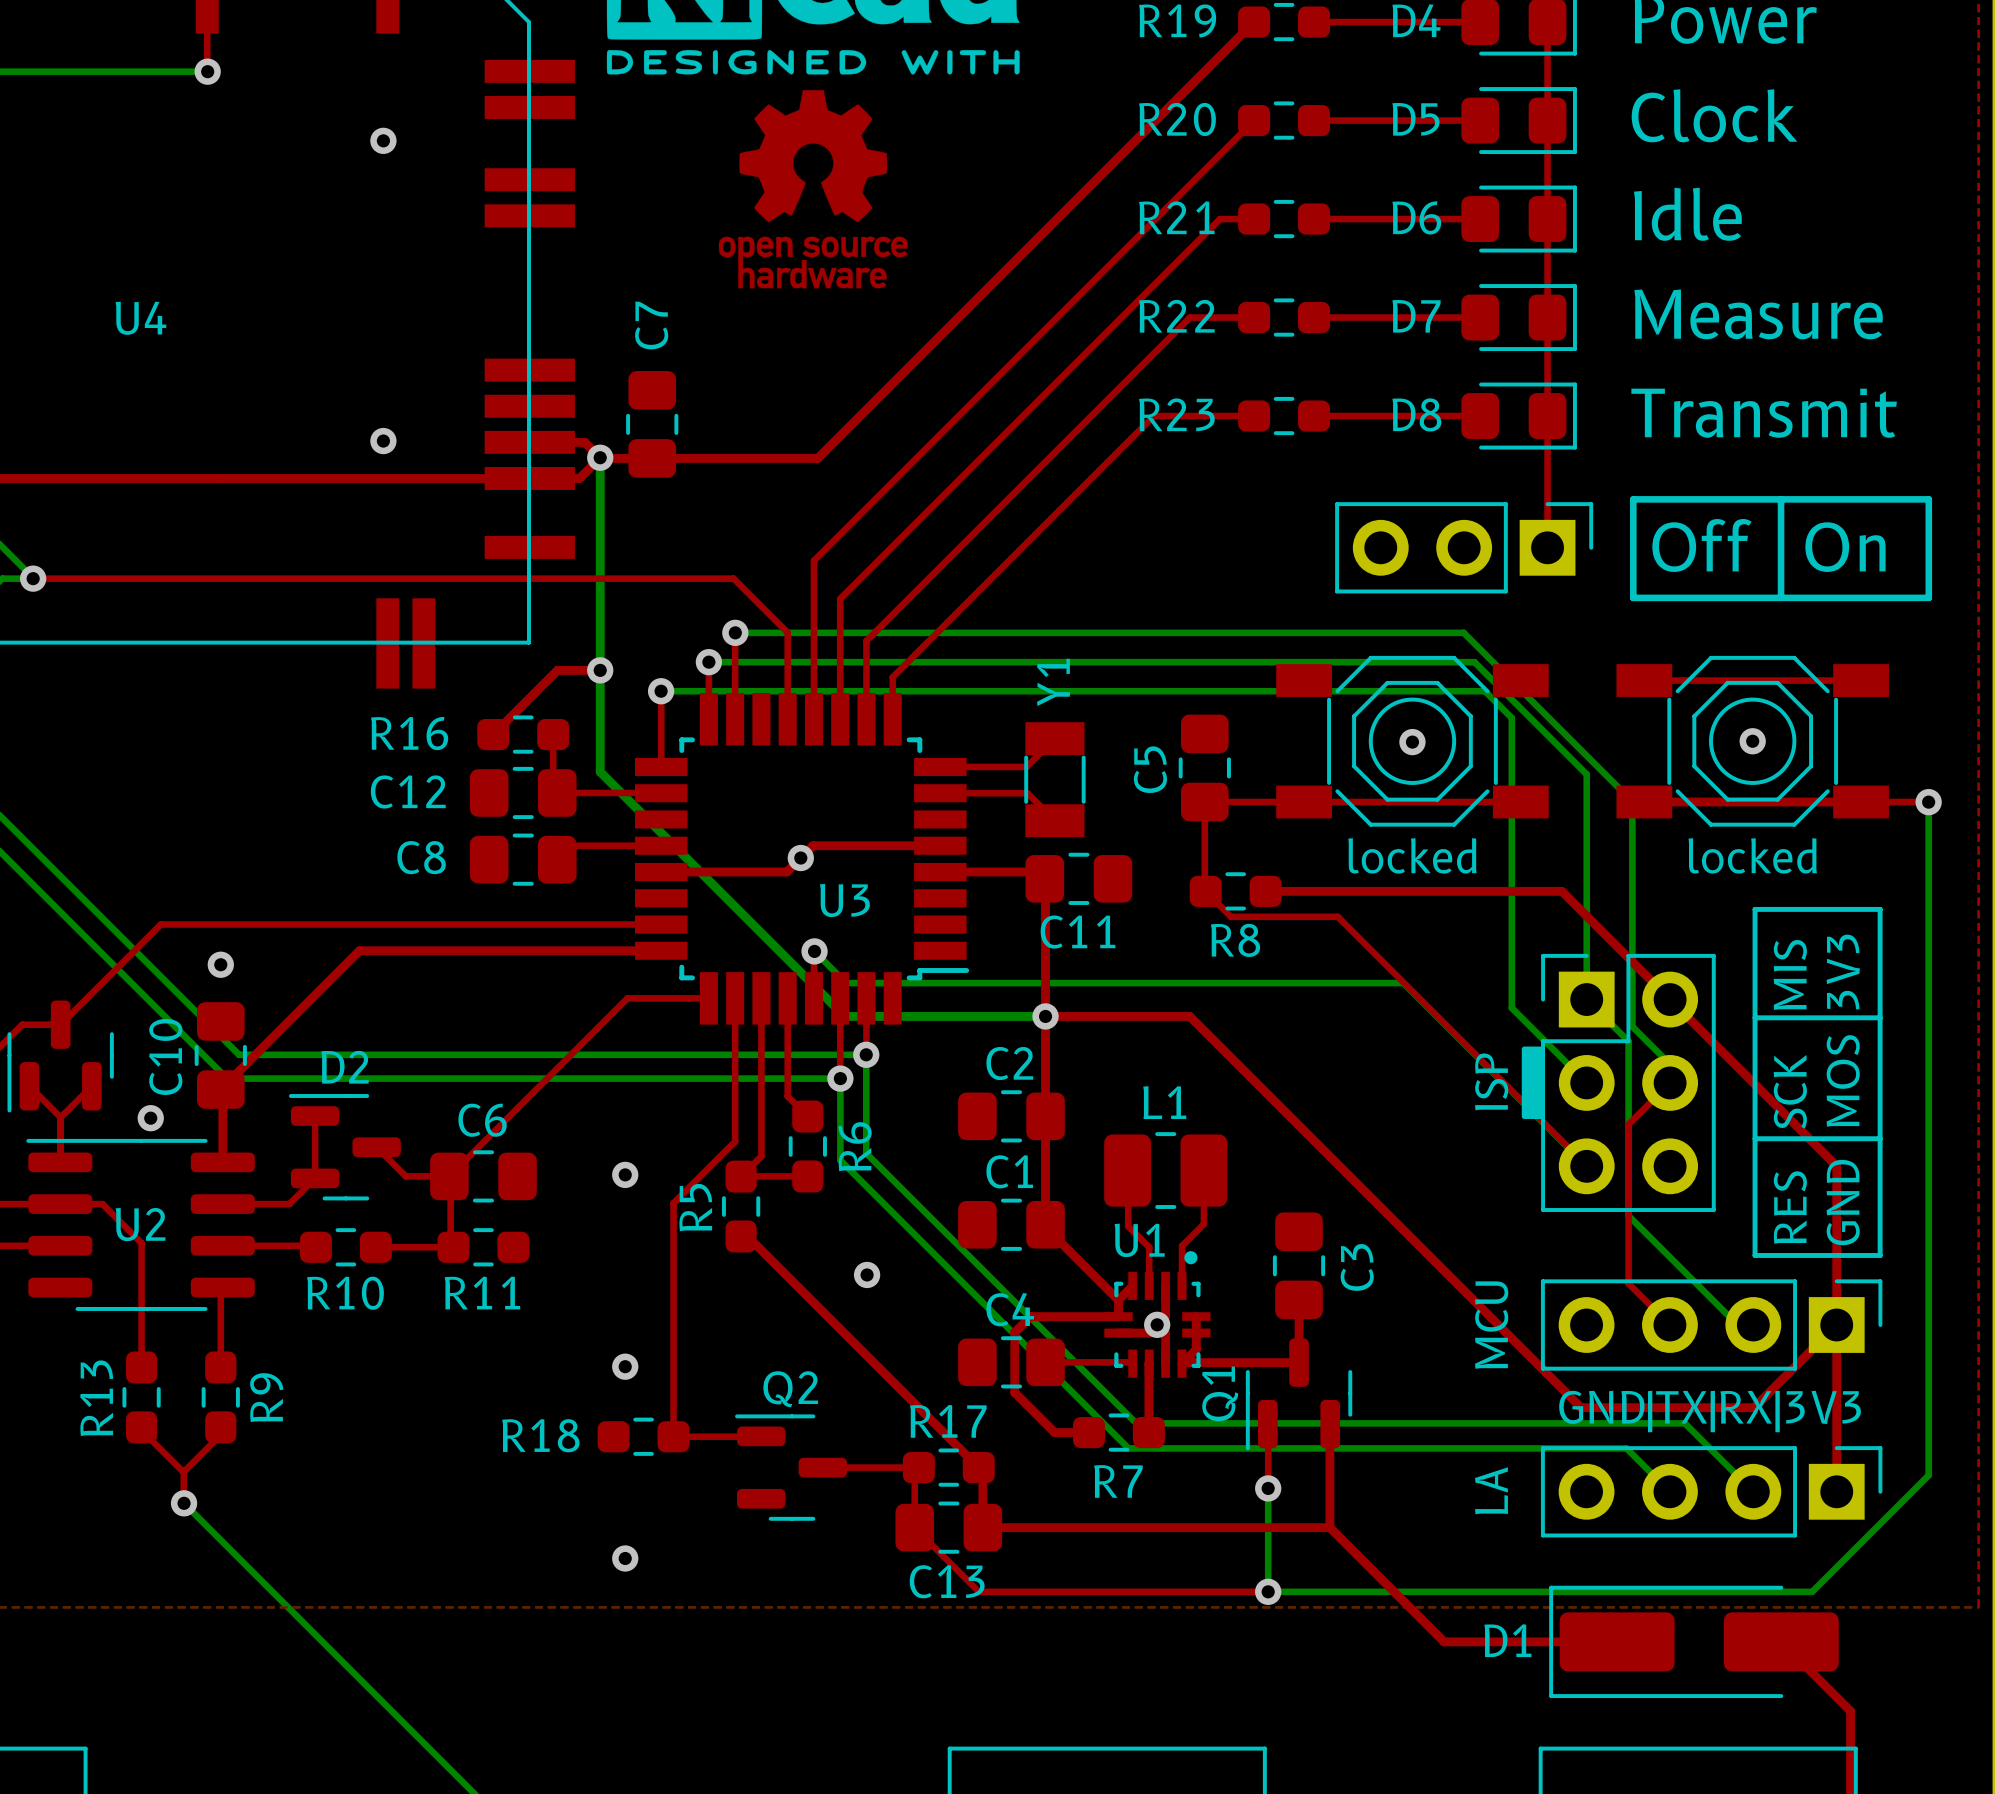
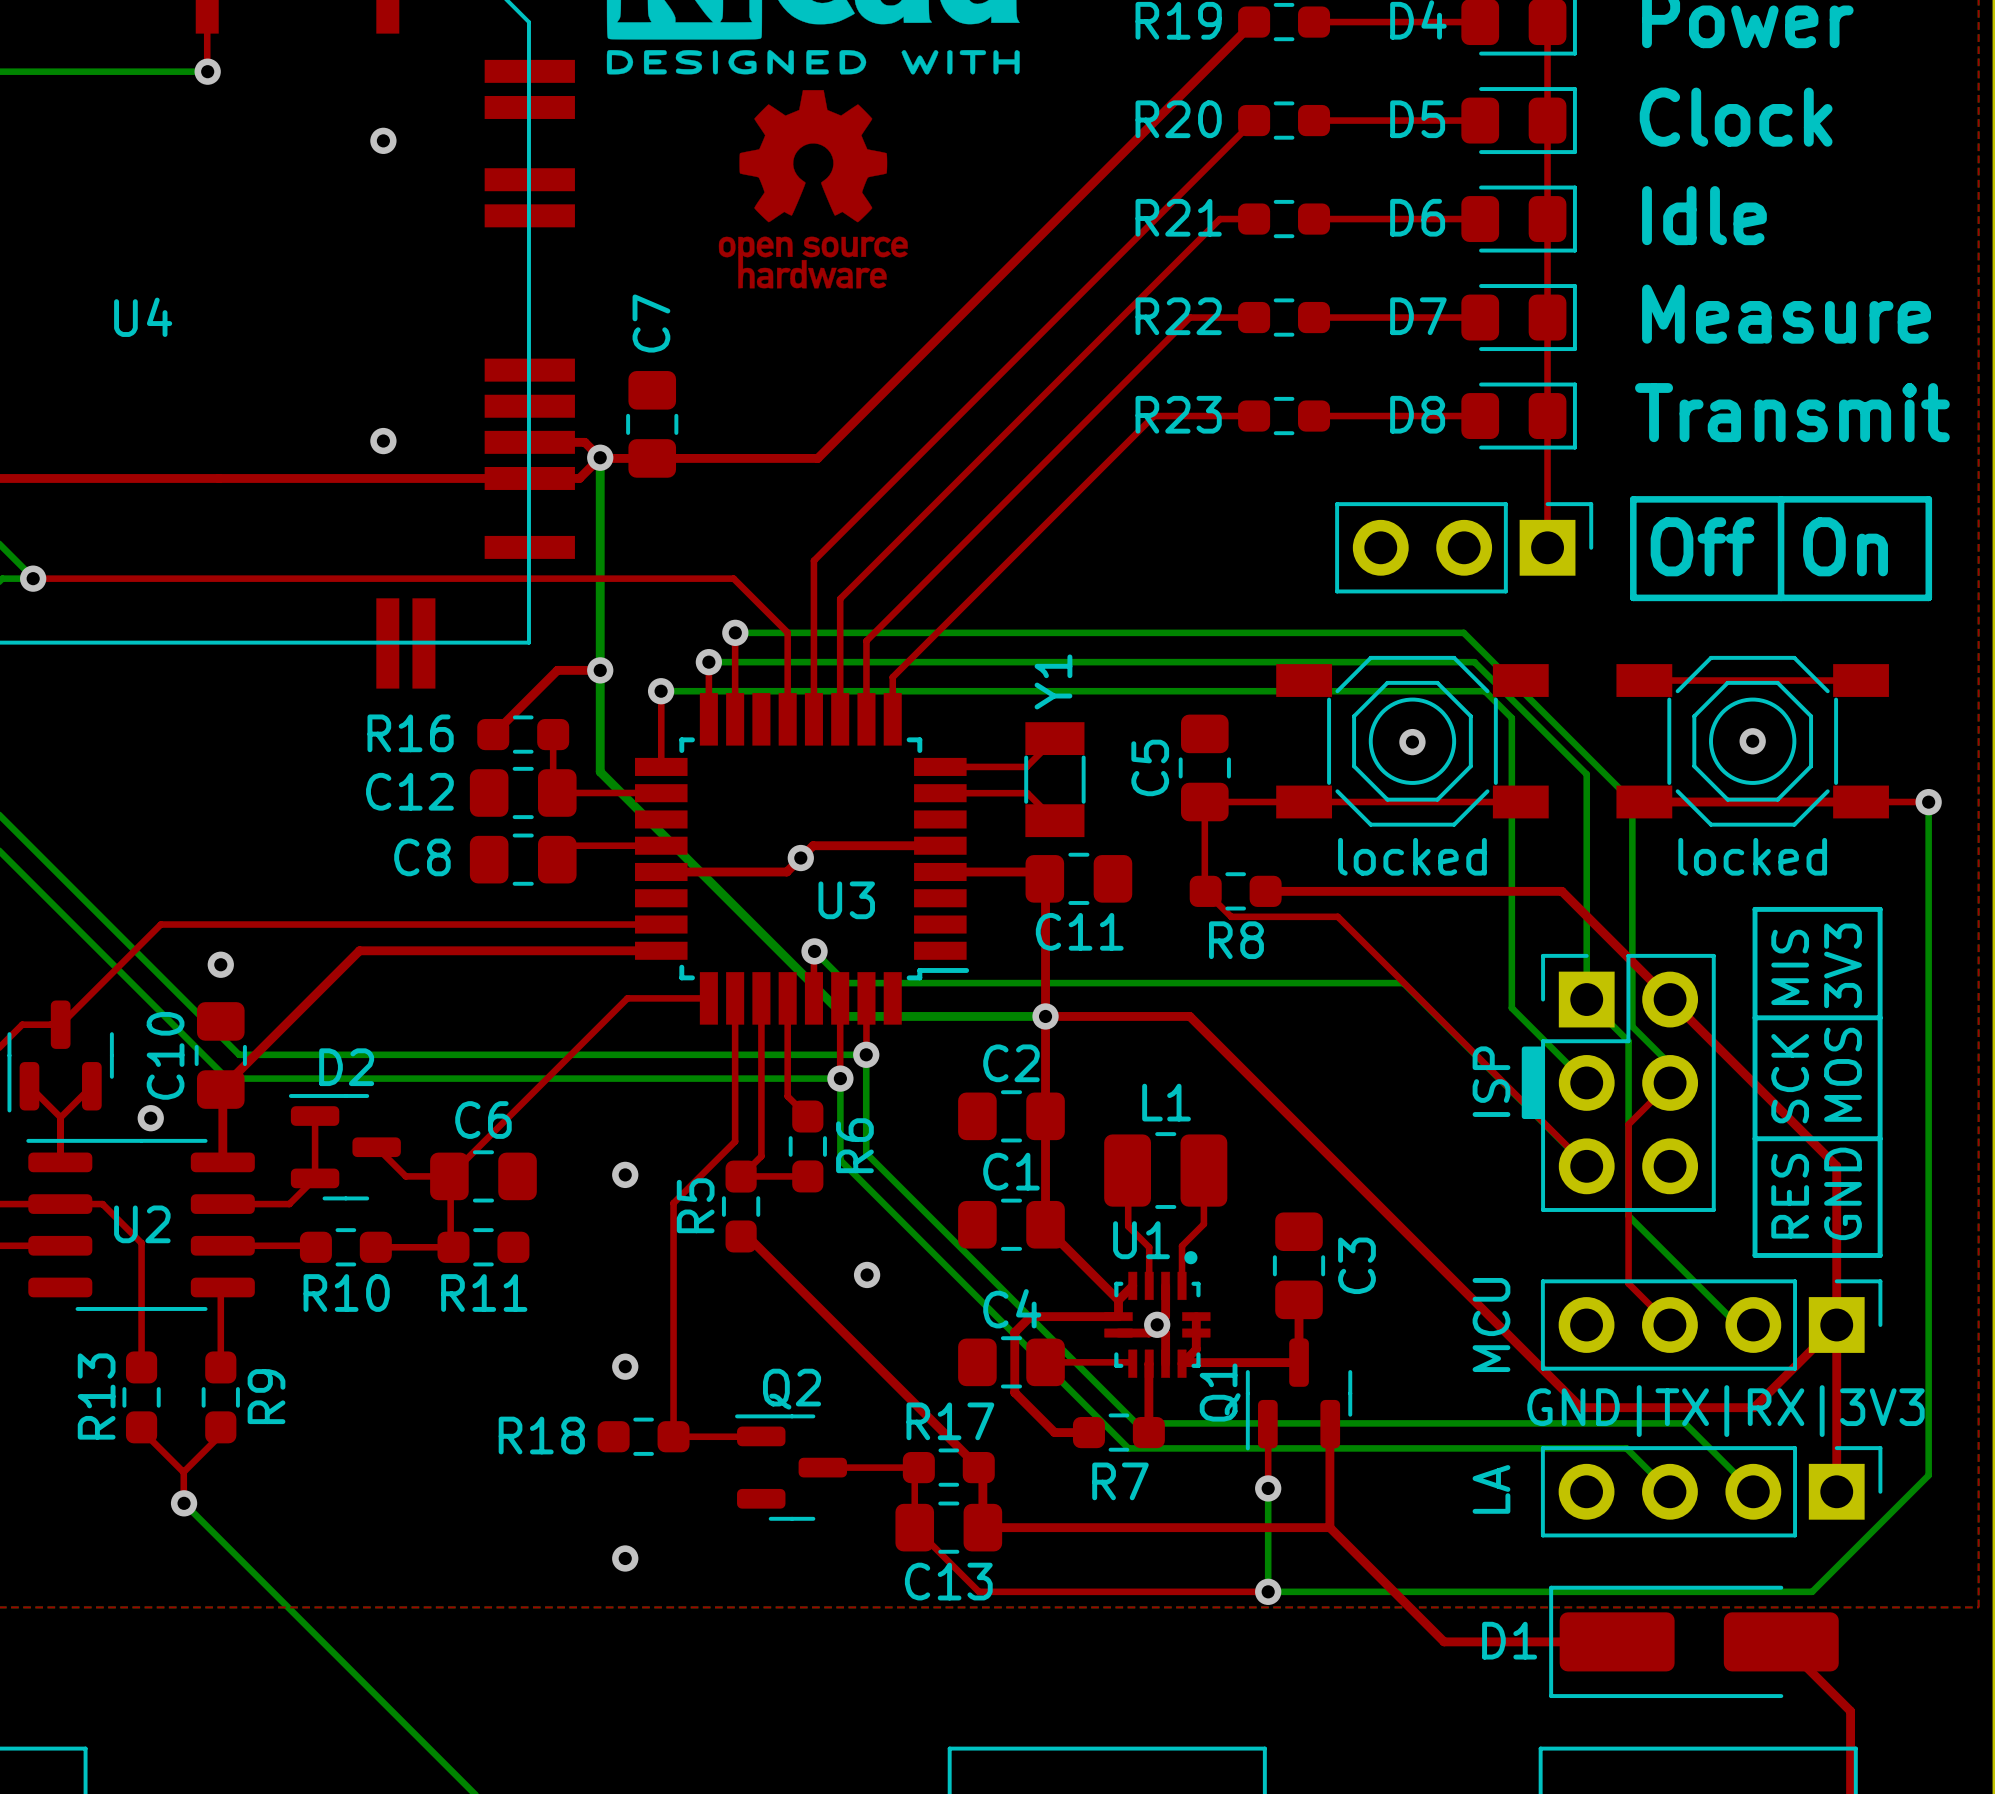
text position: GND|TX|RX|3V3 (1710, 1411) -> GND|TX|RX|3V3 (1726, 1411)

